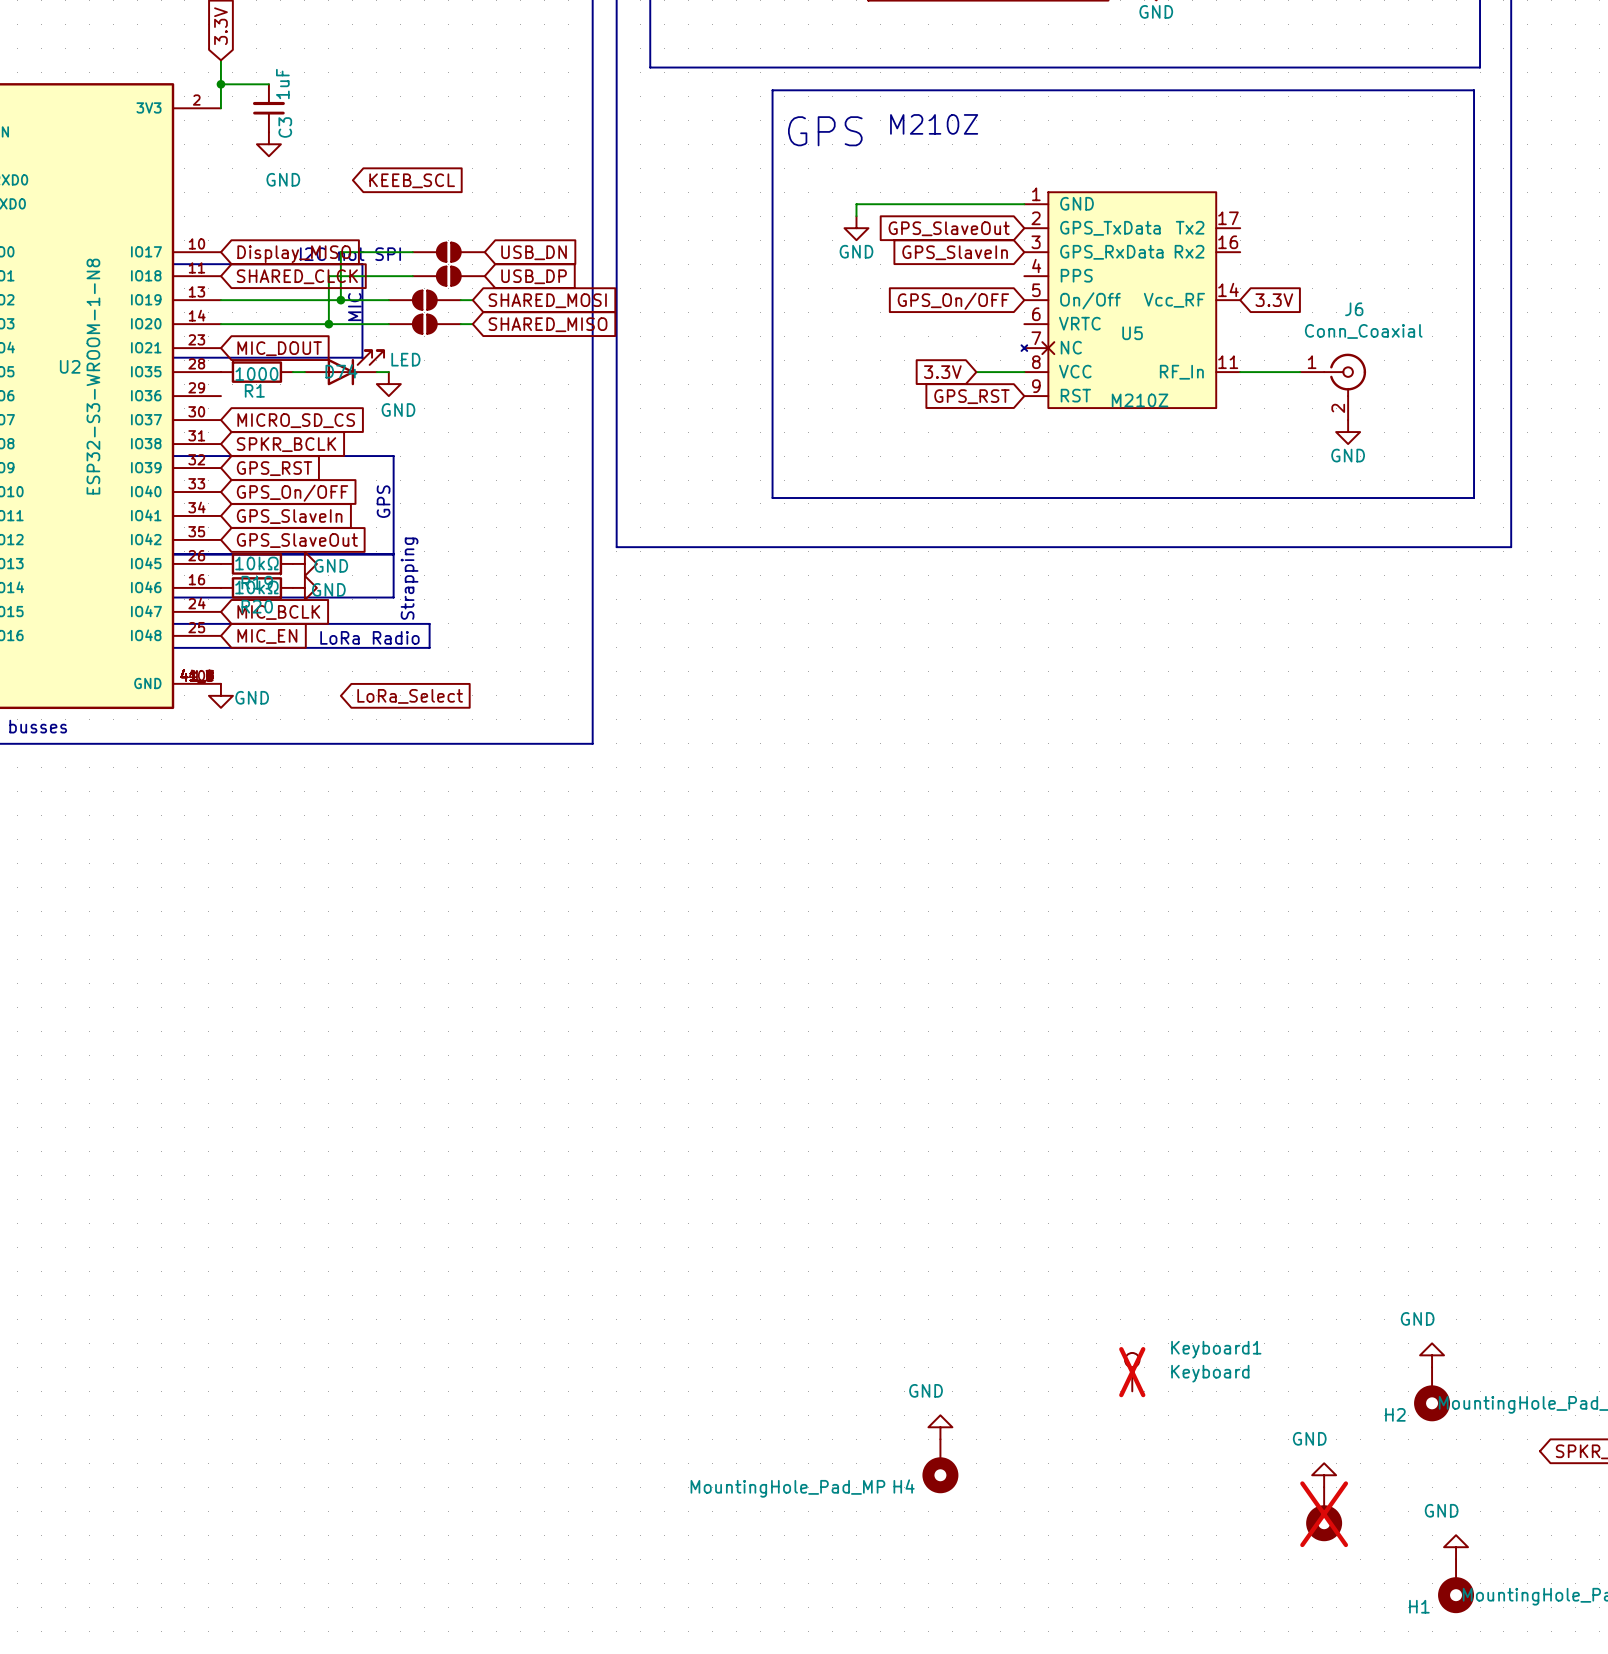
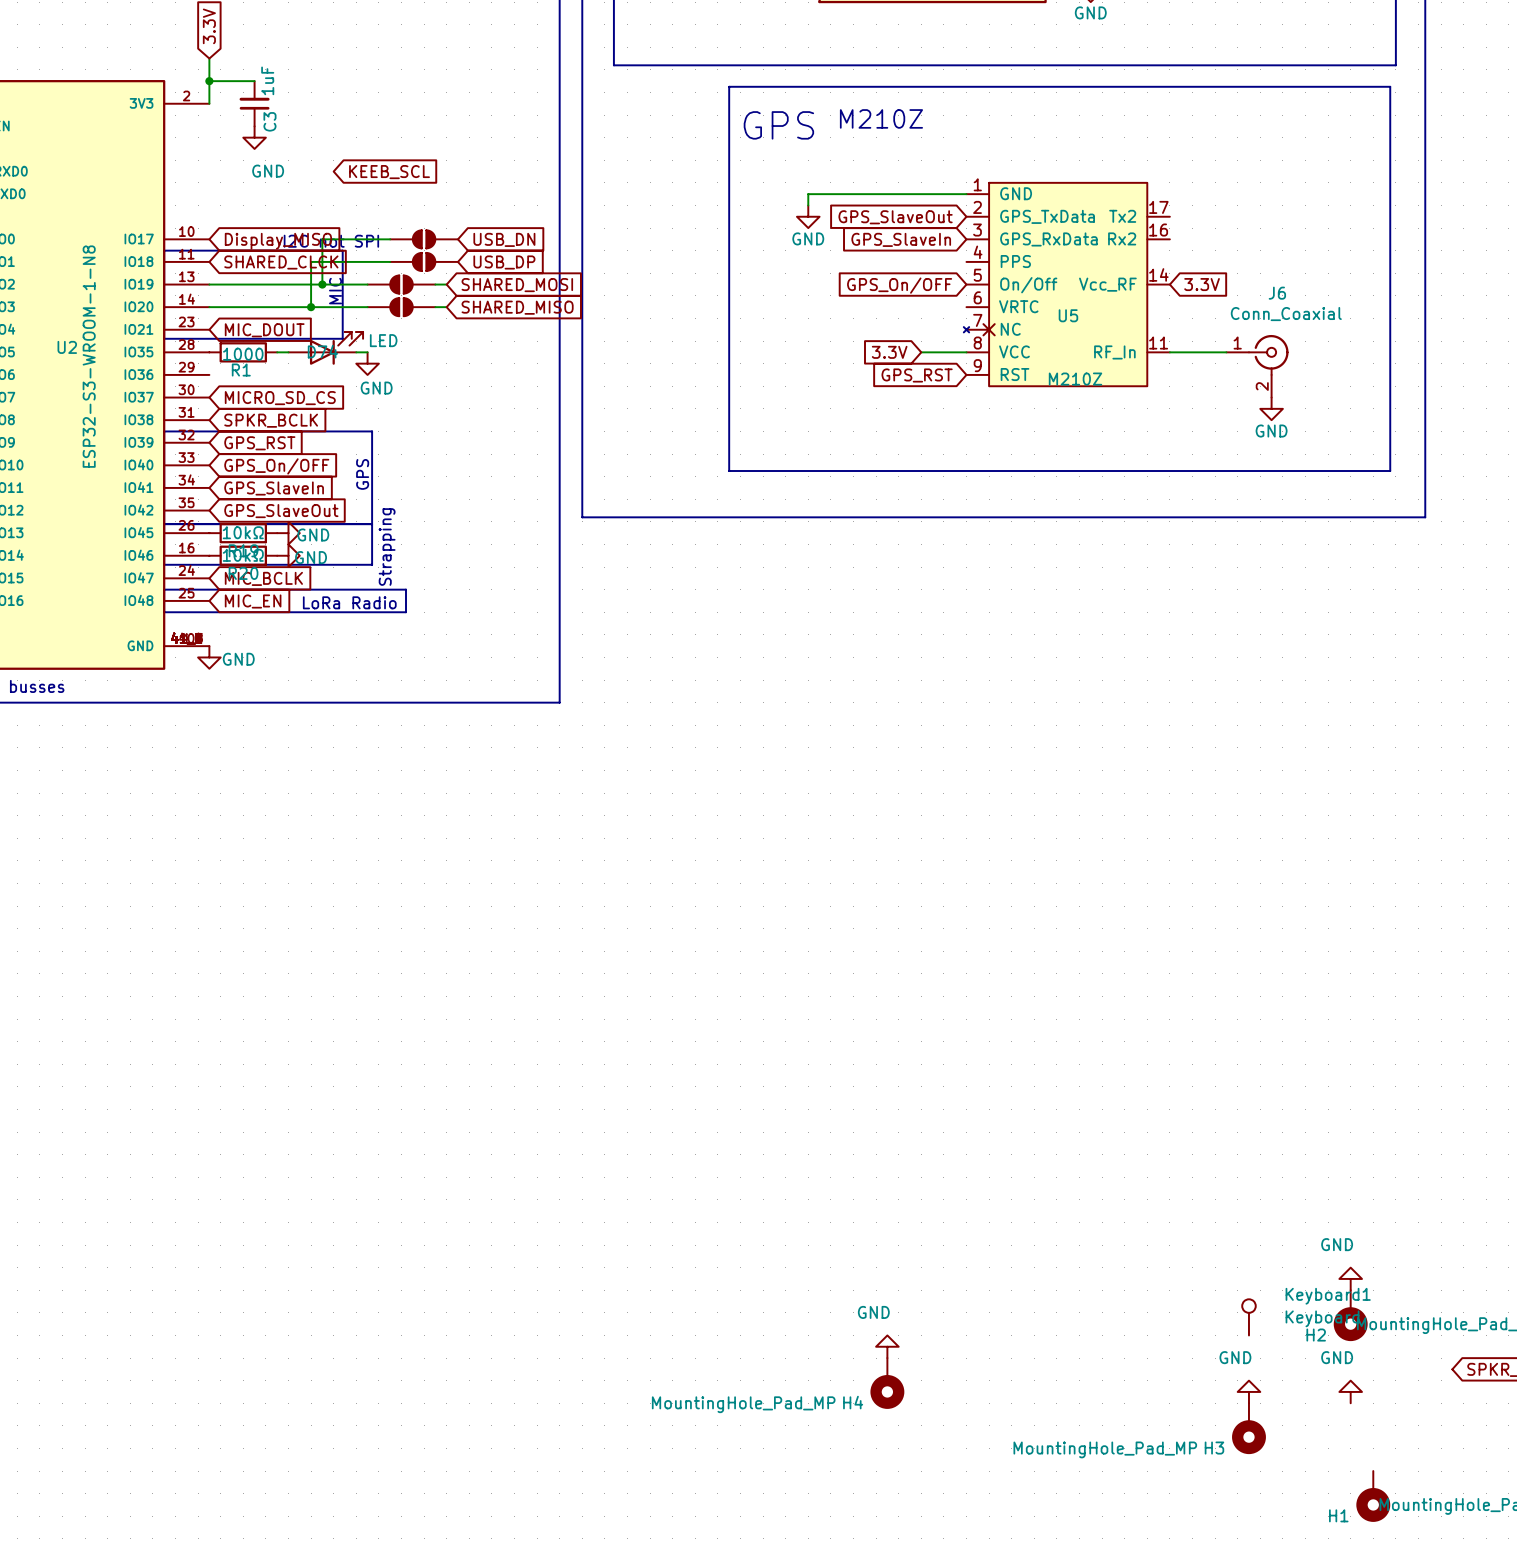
global label: LoRa_Select (410, 696) -> none
Keyboard1 position: (1132, 1372) -> (1248, 1317)
Keyboard1 do-not-place cross: (1132, 1372) -> none
H3 do-not-place cross: (1324, 1514) -> none
H3 name: none -> H3 (1214, 1448)
H3 value: none -> MountingHole_Pad_MP (1105, 1449)
power symbol position: GND (1456, 1547) -> GND (1350, 1391)

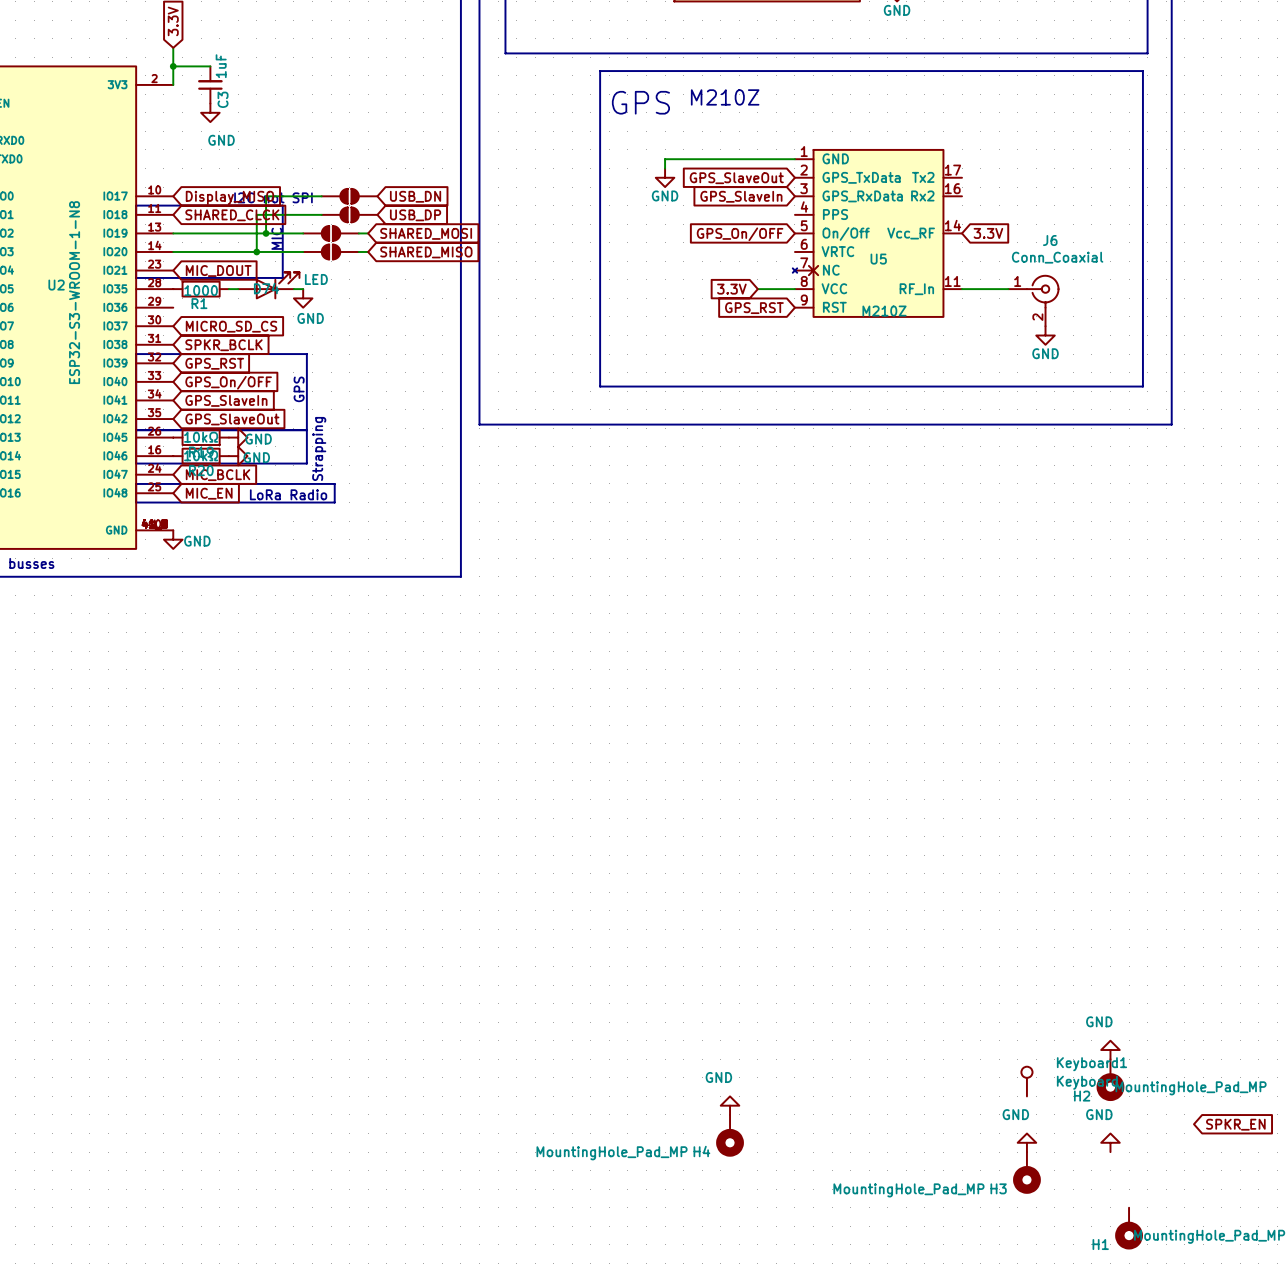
global label: KEEB_SCL (389, 172) -> none

